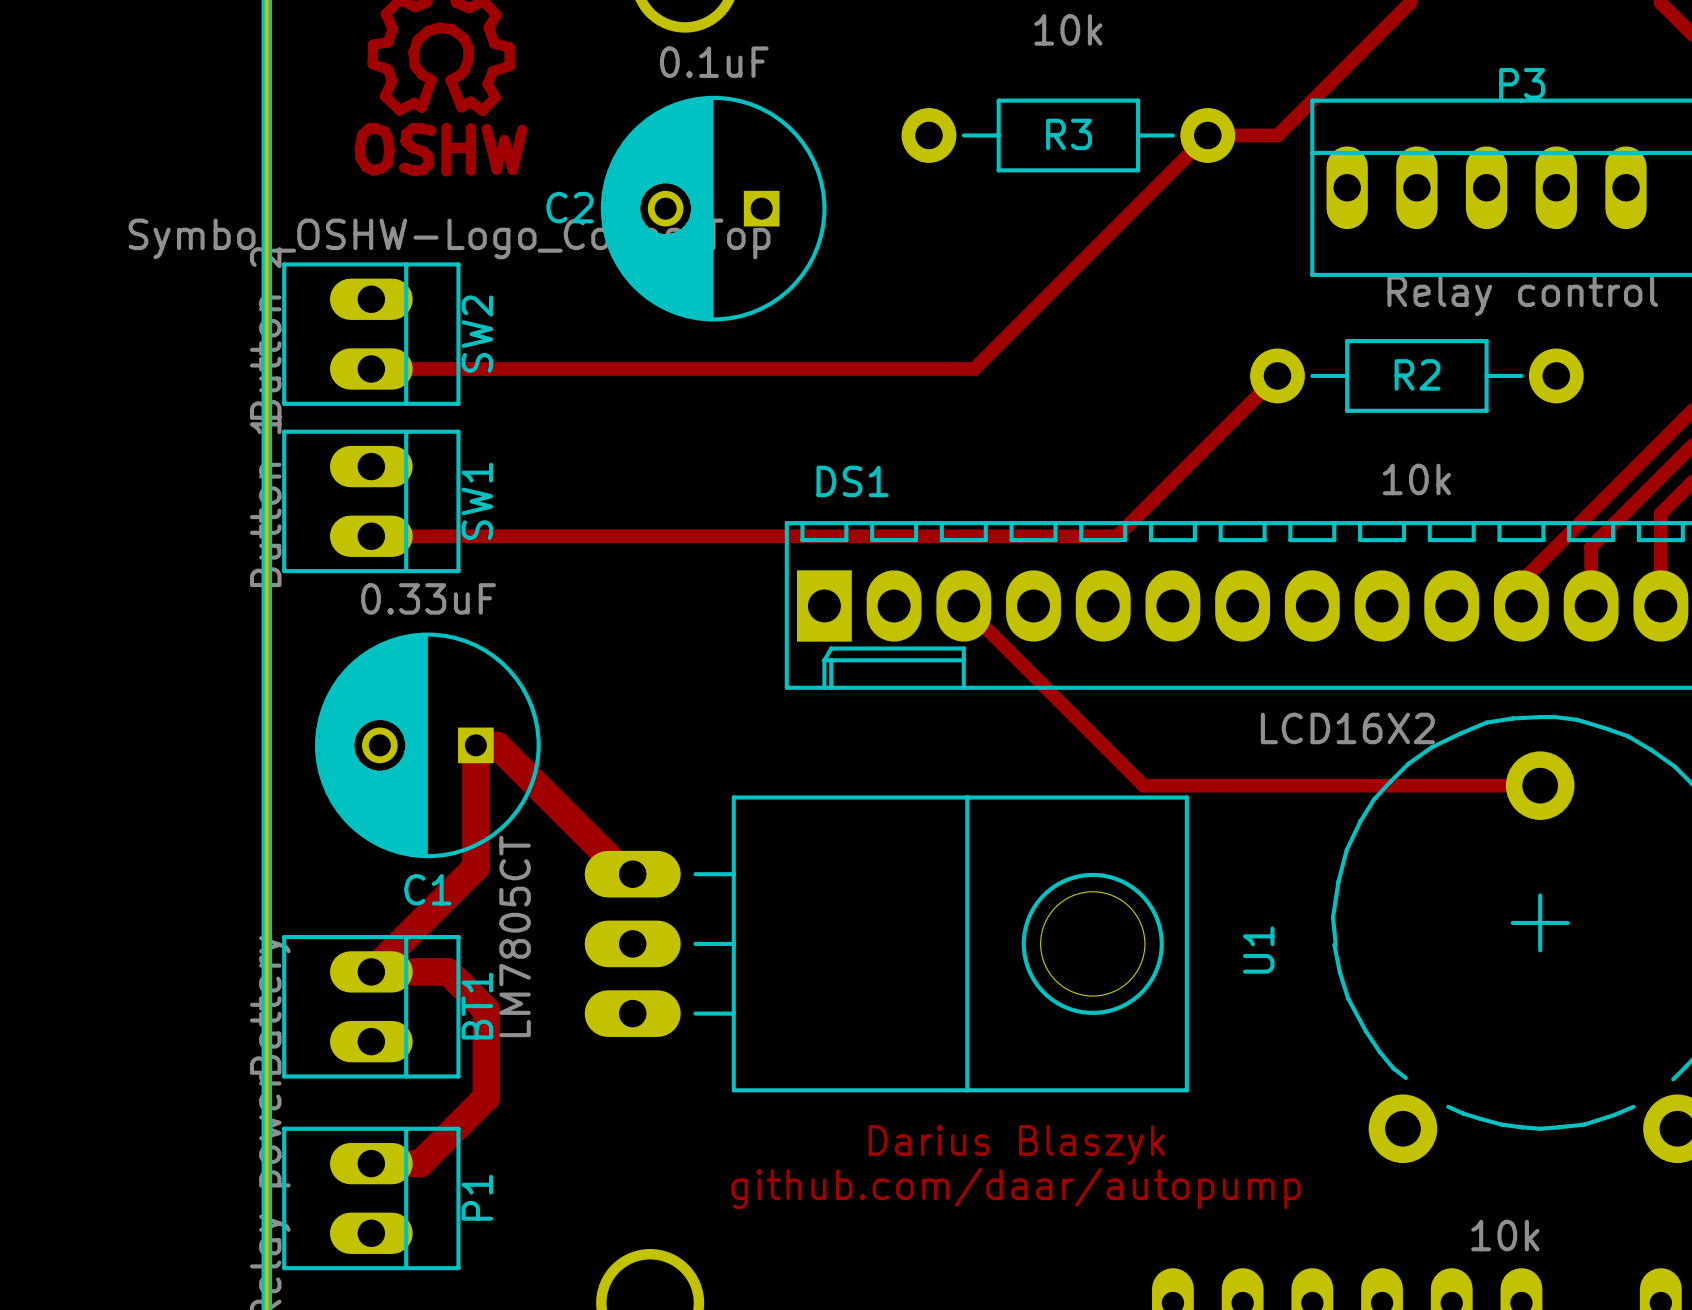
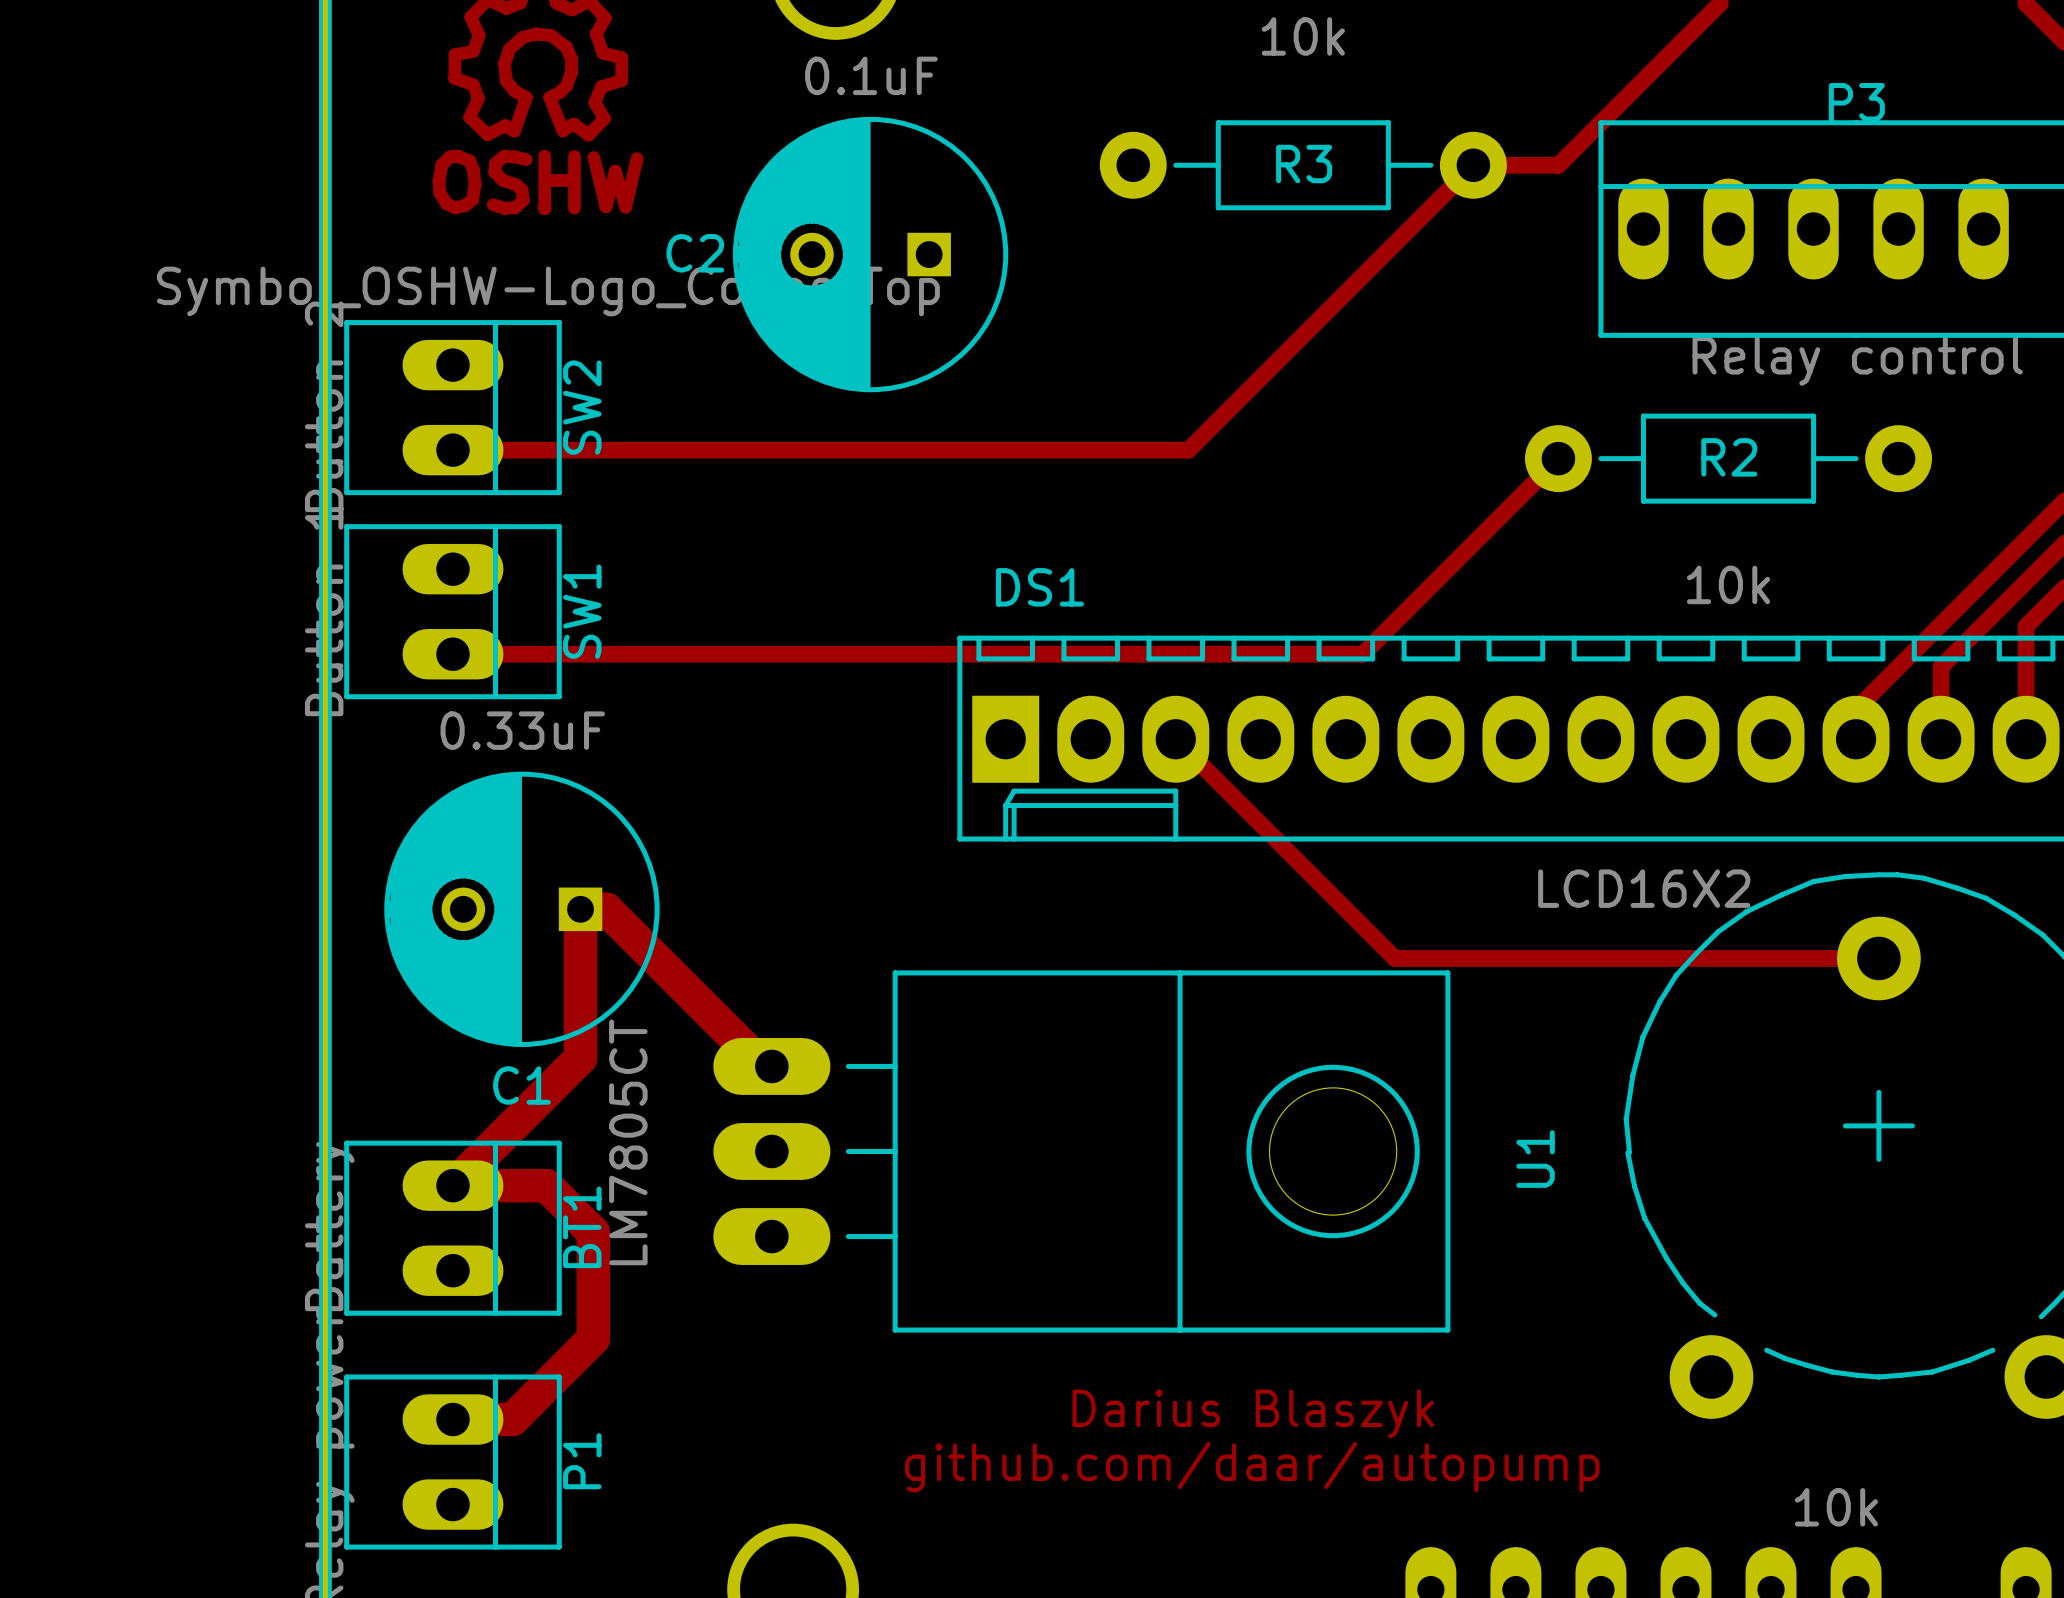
text position: Darius Blaszyk (1016, 1145) -> Darius Blaszyk (1253, 1413)
text position: github.com/daar/autopump (1016, 1188) -> github.com/daar/autopump (1252, 1467)

